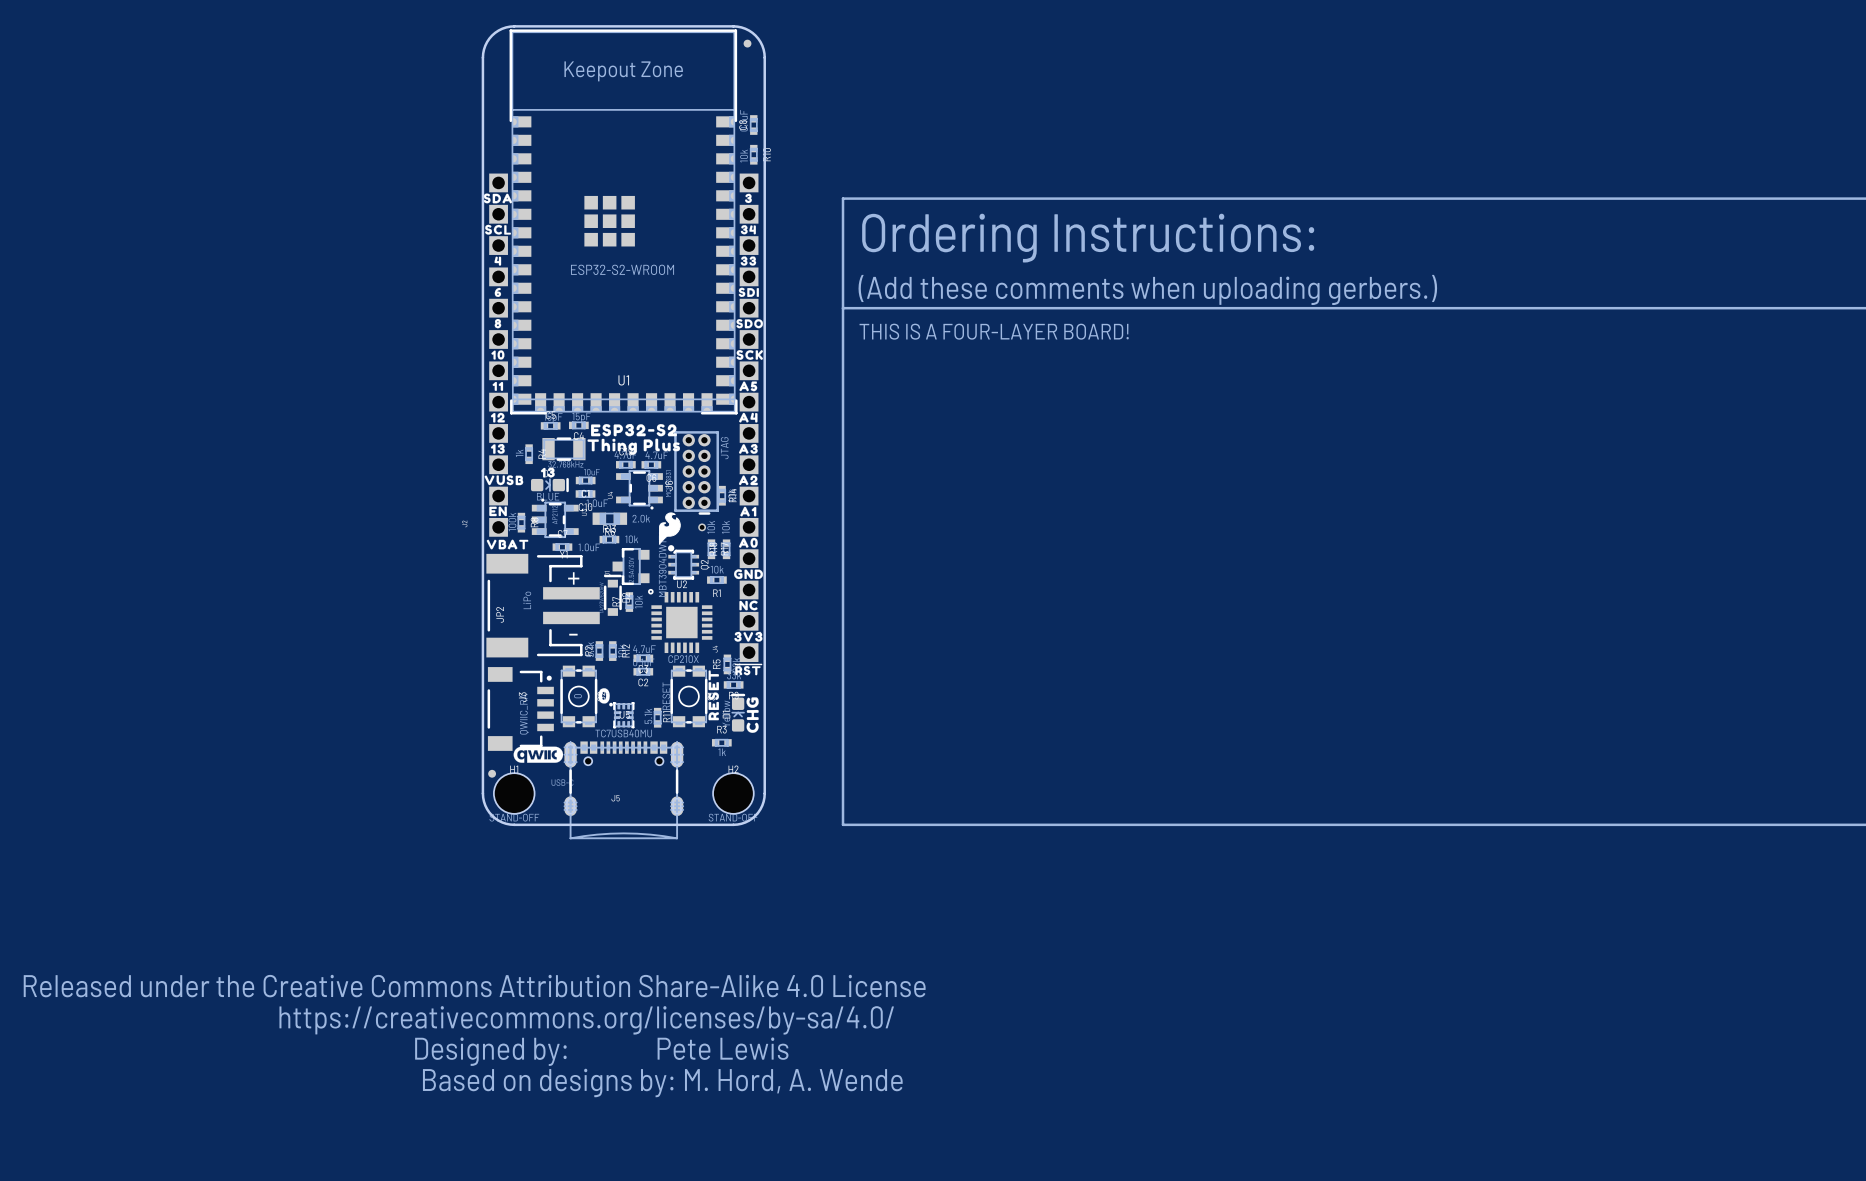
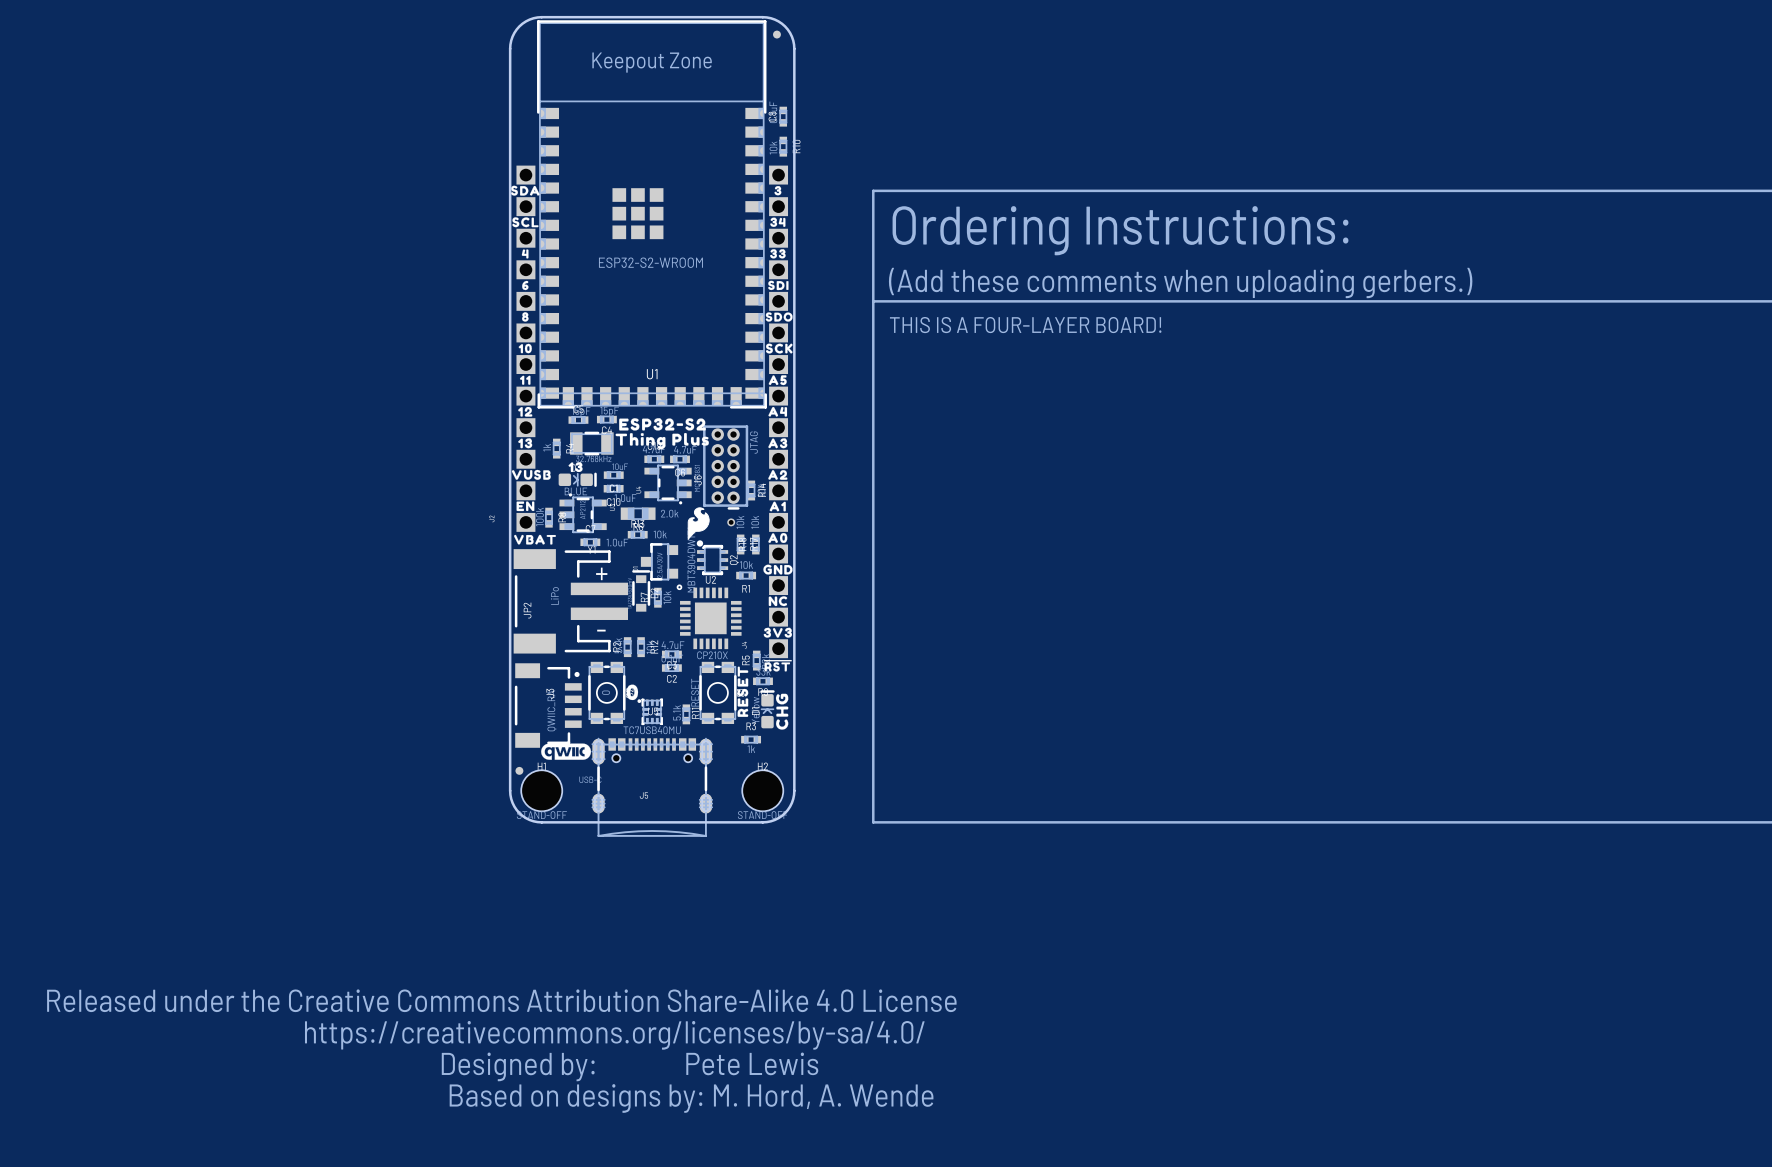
drawing position: (474, 1020) -> (501, 1035)
text position: Pete Lewis (723, 1048) -> Pete Lewis (752, 1063)
text position: Based on designs by: M. Hord, A. Wende (662, 1082) -> Based on designs by: M. Hord, A. Wende (691, 1098)

